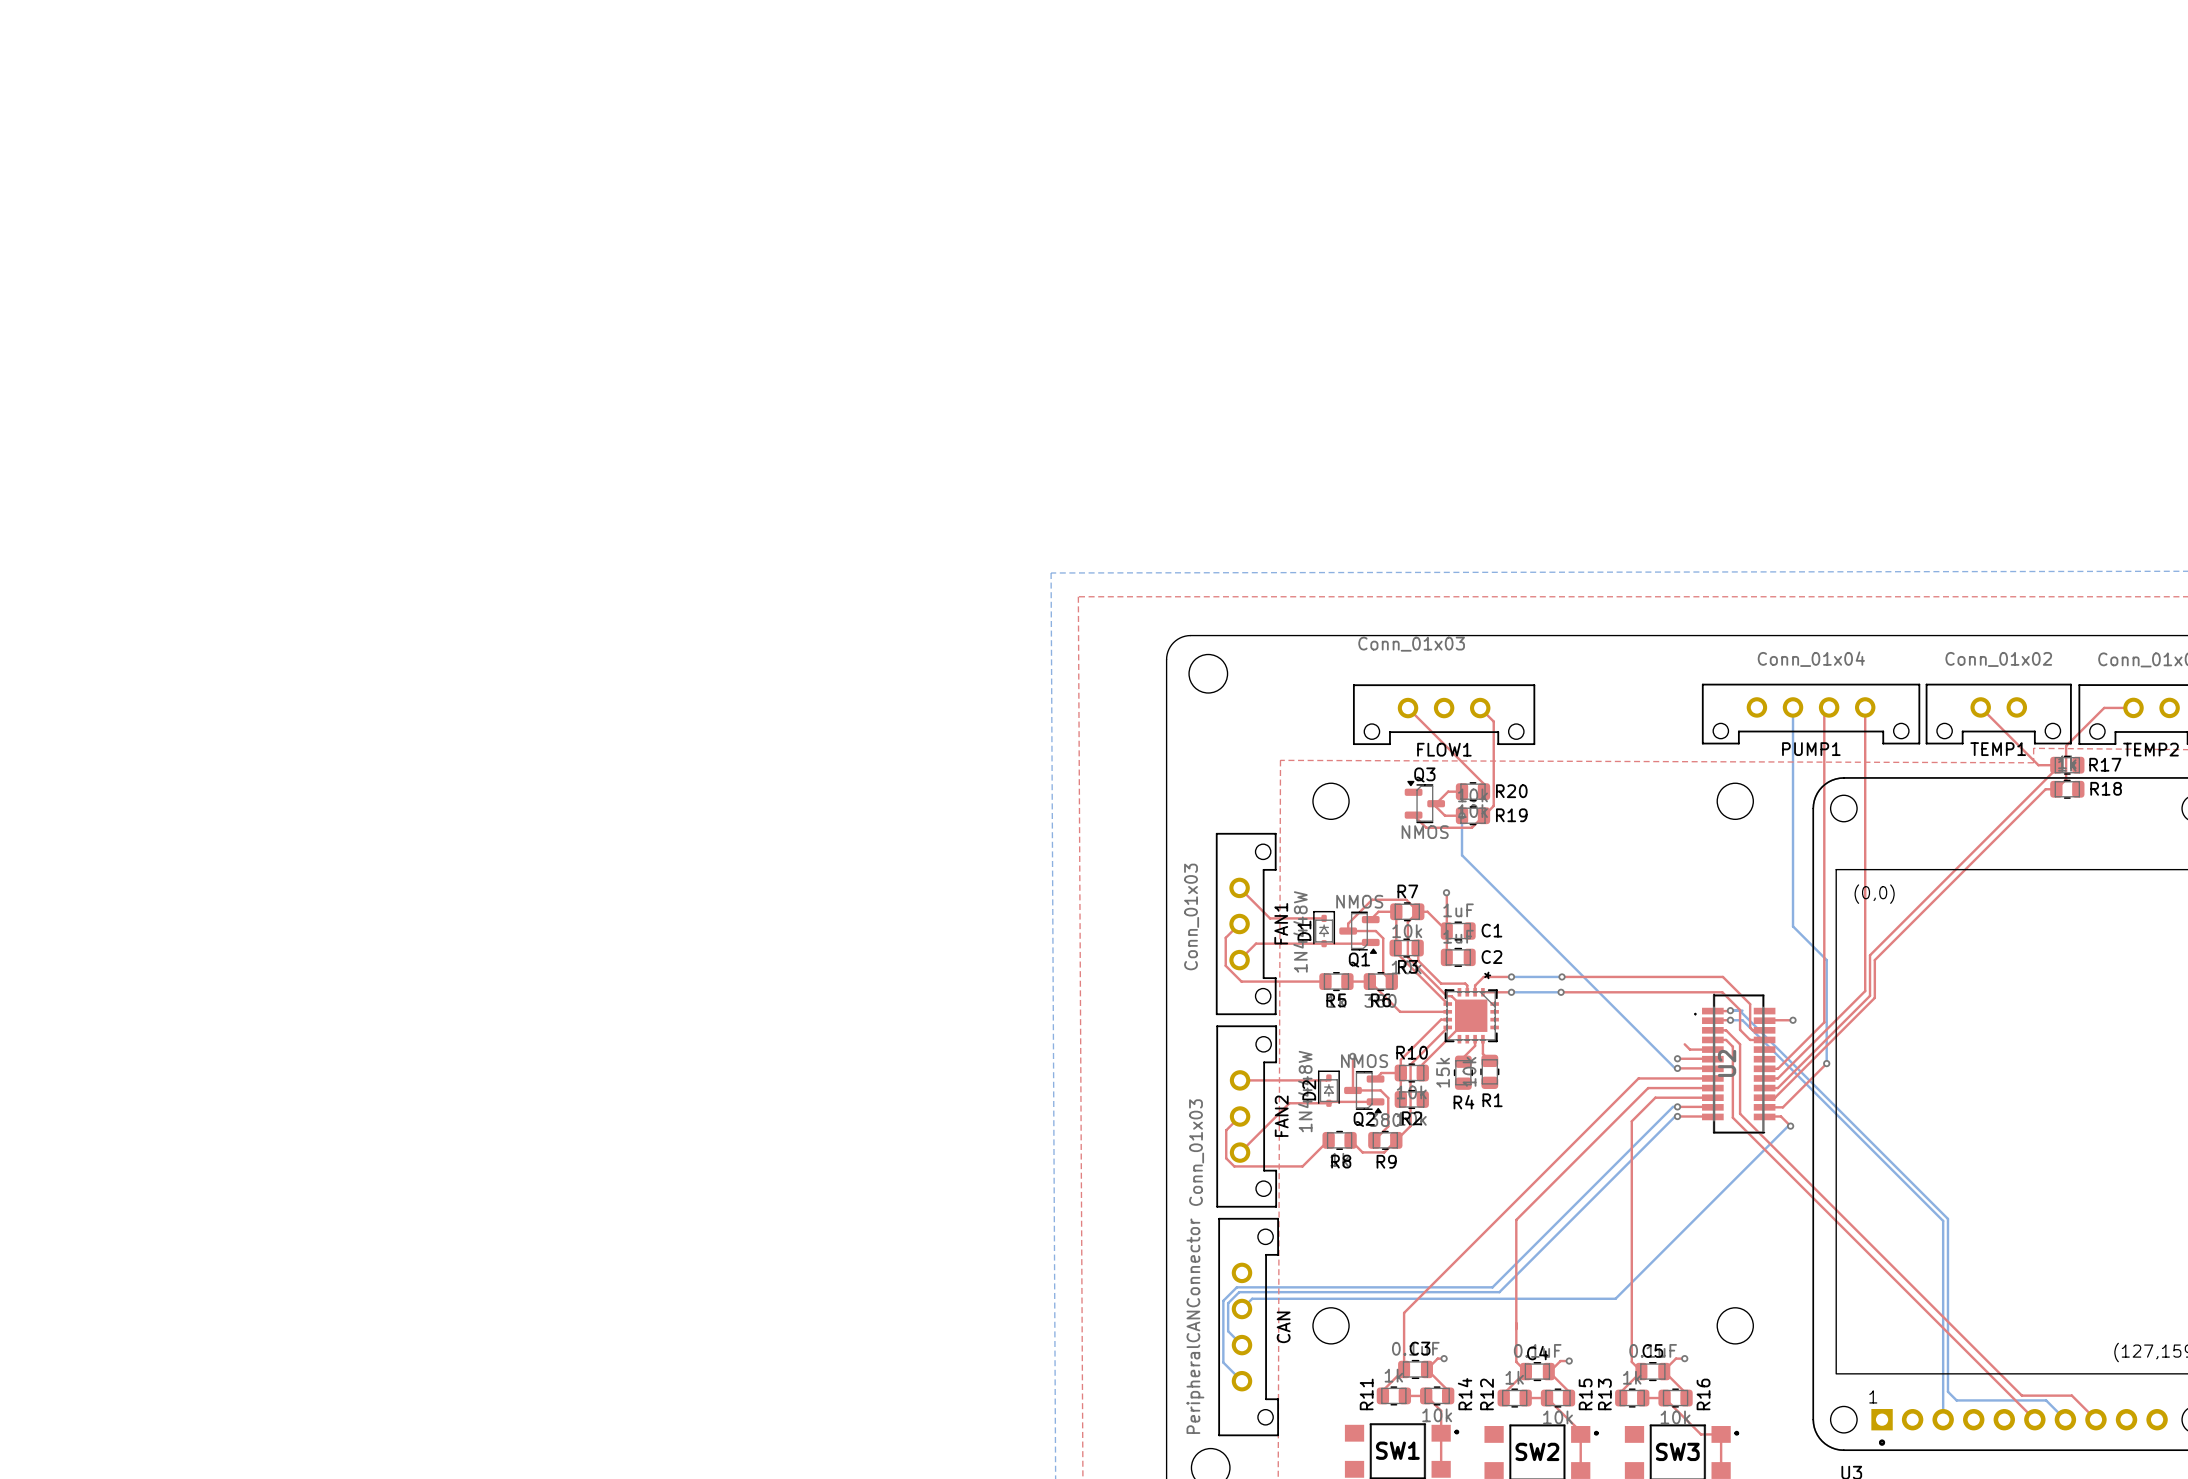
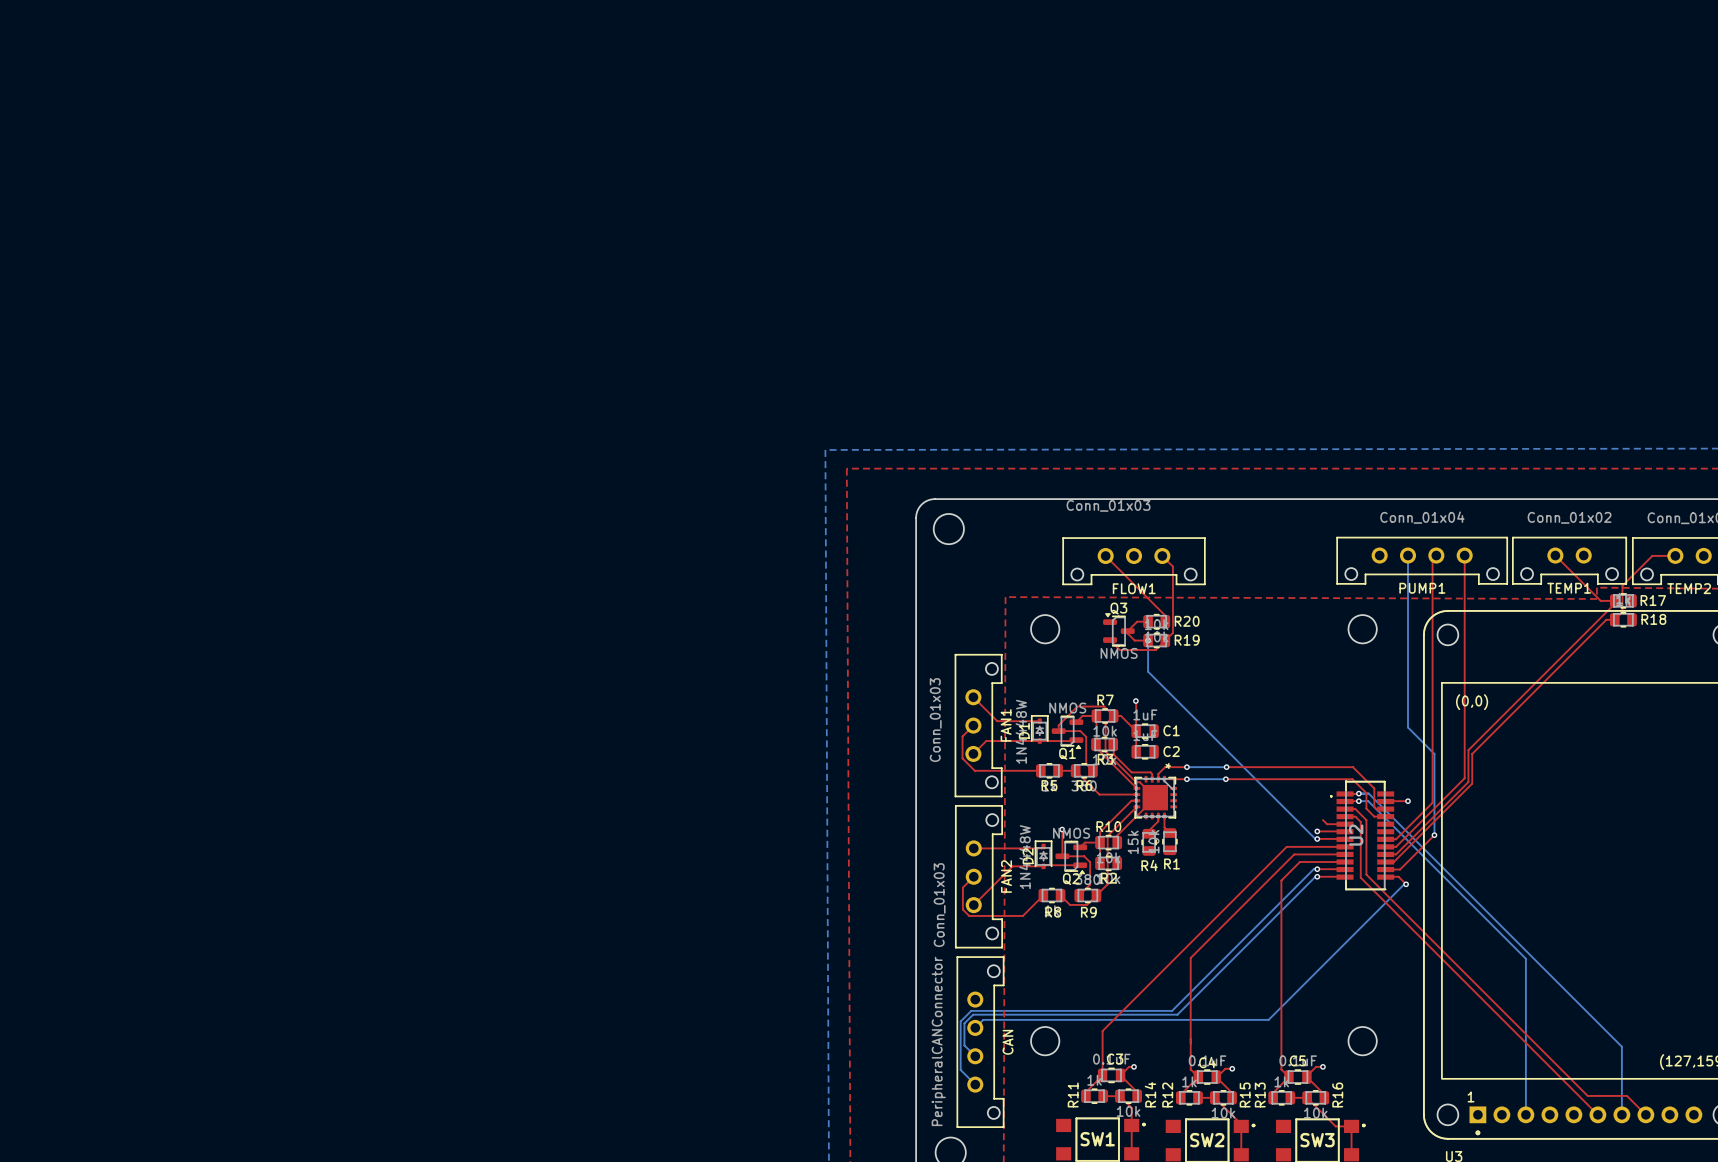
bottom track: (1739, 1010) (1947, 1218) (1947, 1391) (1956, 1400) (2046, 1400) (2065, 1419) -> (1368, 793) (1621, 1046) (1621, 1114)

